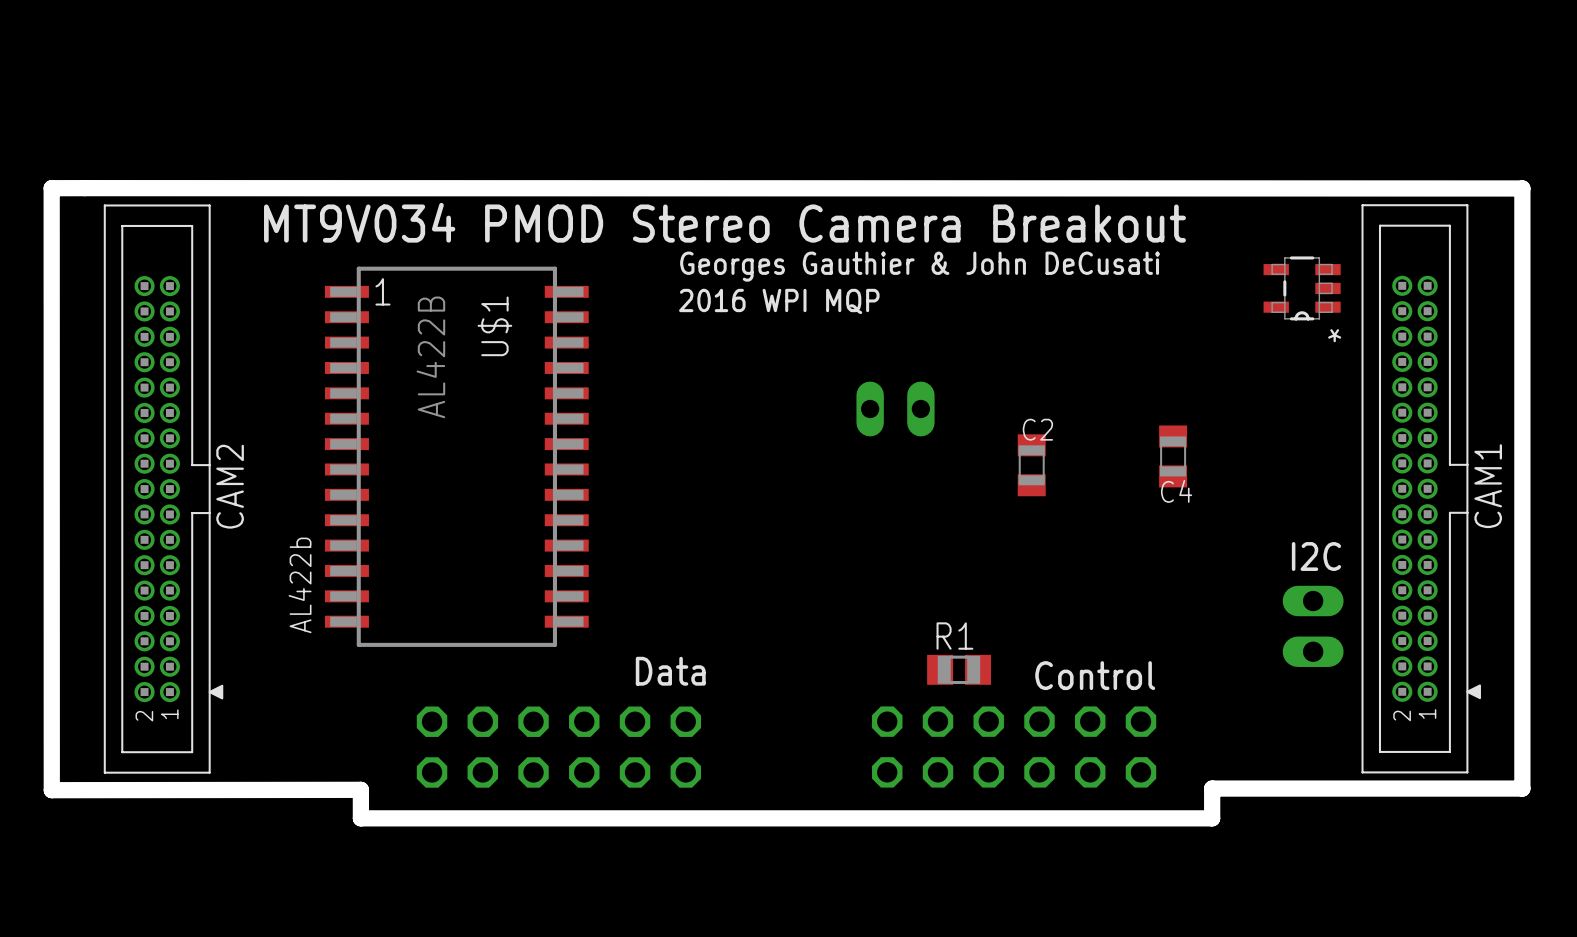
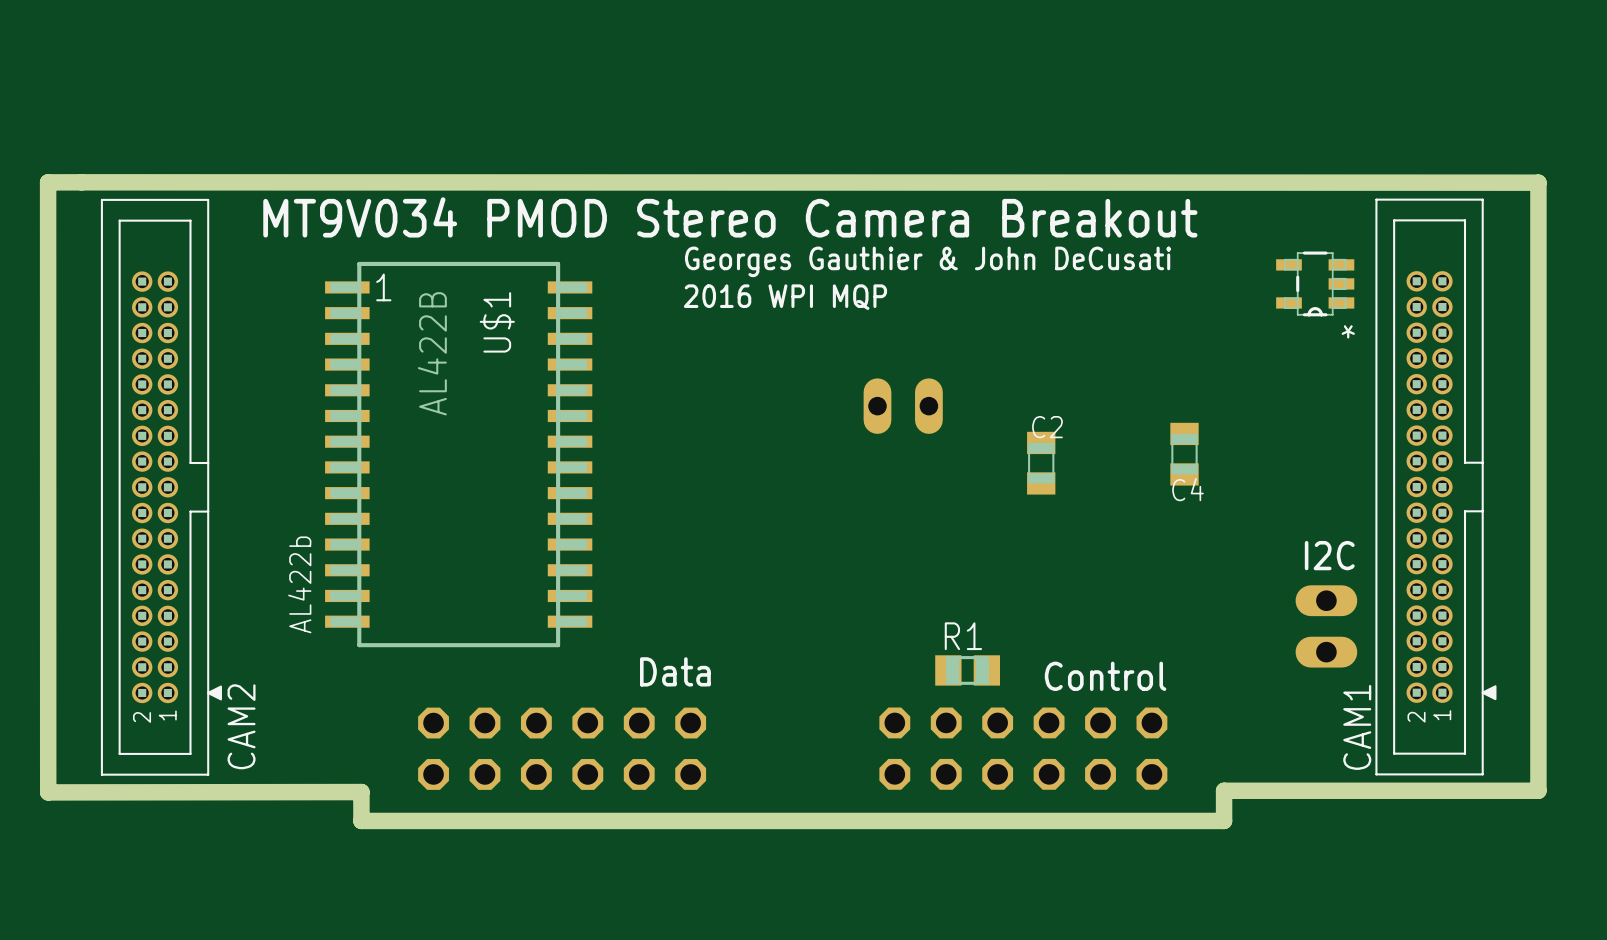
CAM2 name position: CAM2 (230, 486) -> CAM2 (241, 726)
CAM1 name position: CAM1 (1488, 486) -> CAM1 (1357, 727)

